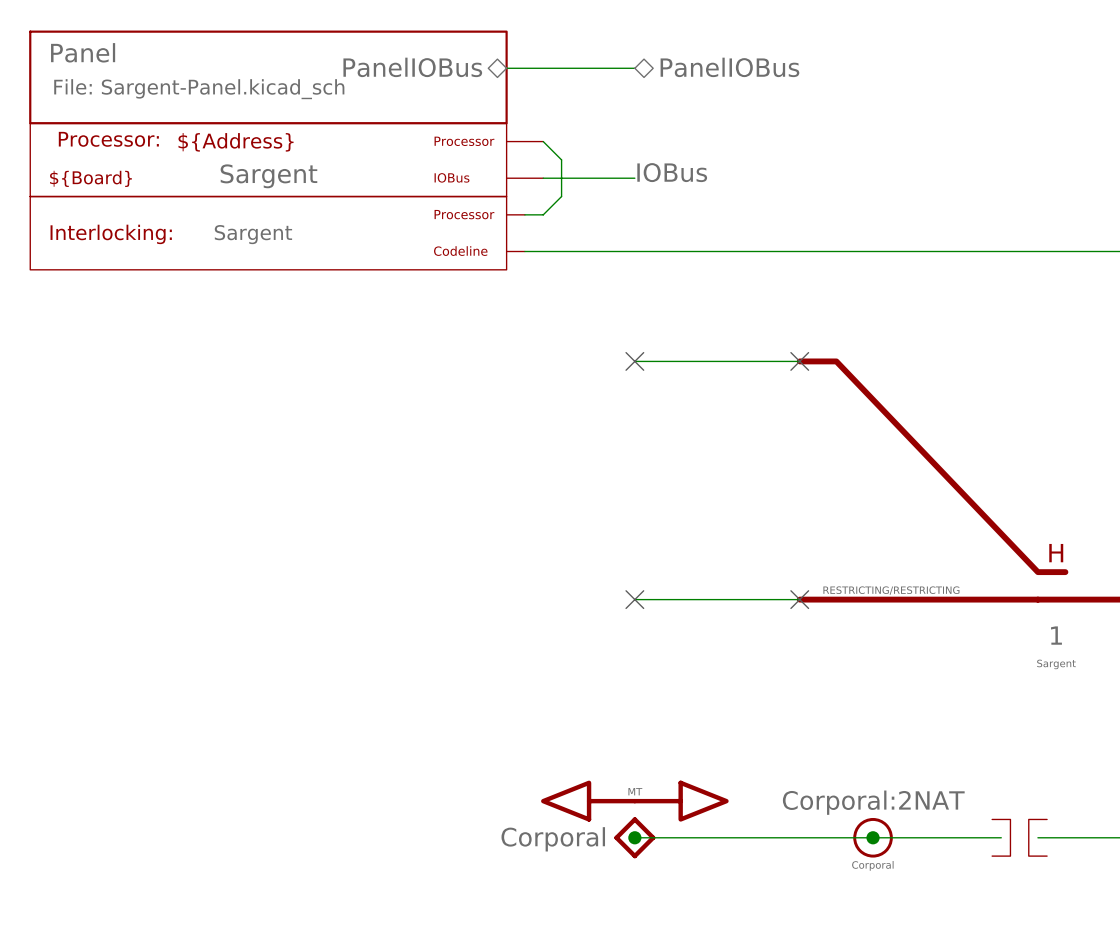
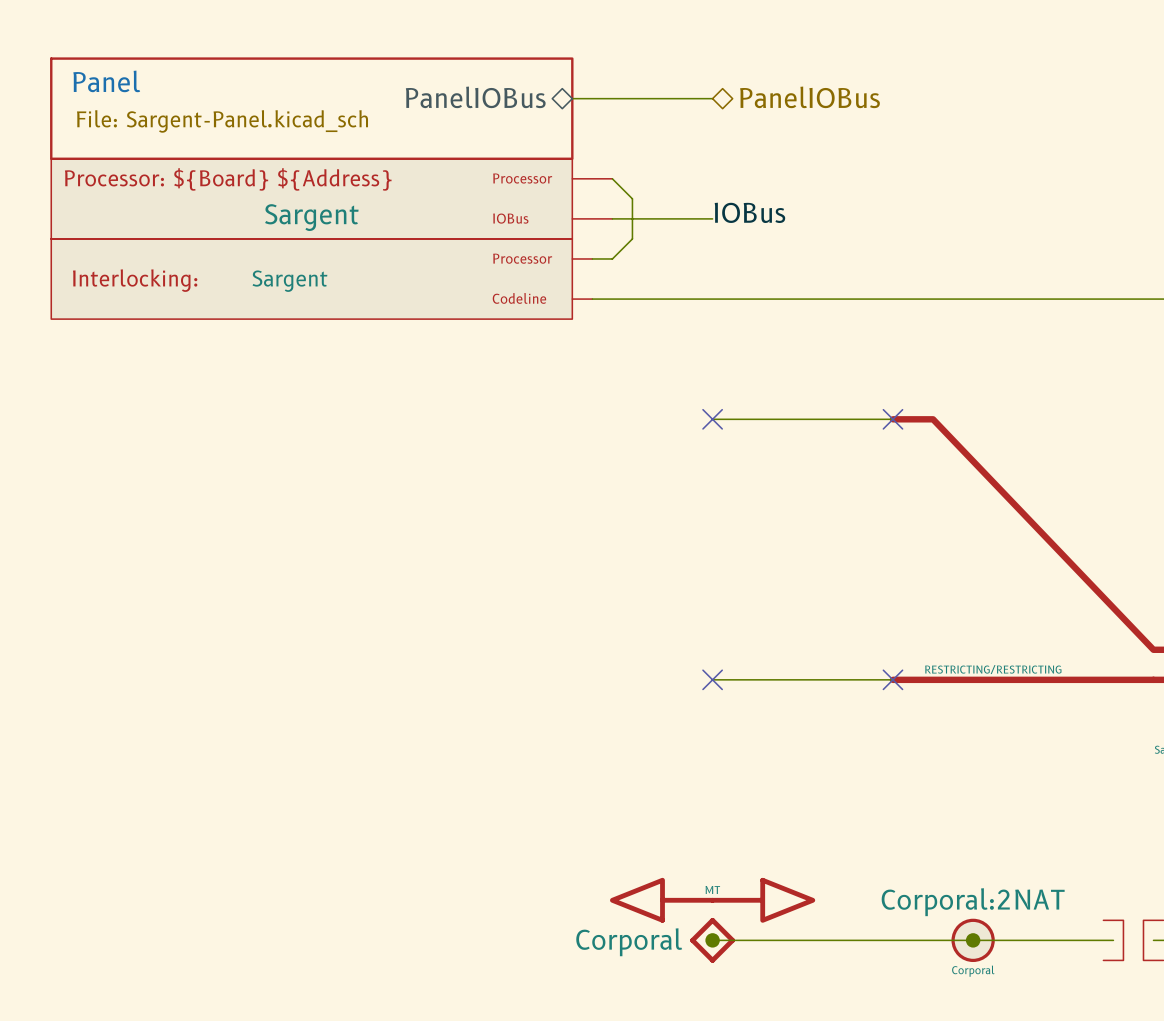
part text: Processor: (108, 139) -> none
part text: none -> Processor: ${Board} ${Address} (228, 179)
part text: ${Address} (236, 142) -> none
part text: ${Board} (91, 178) -> none

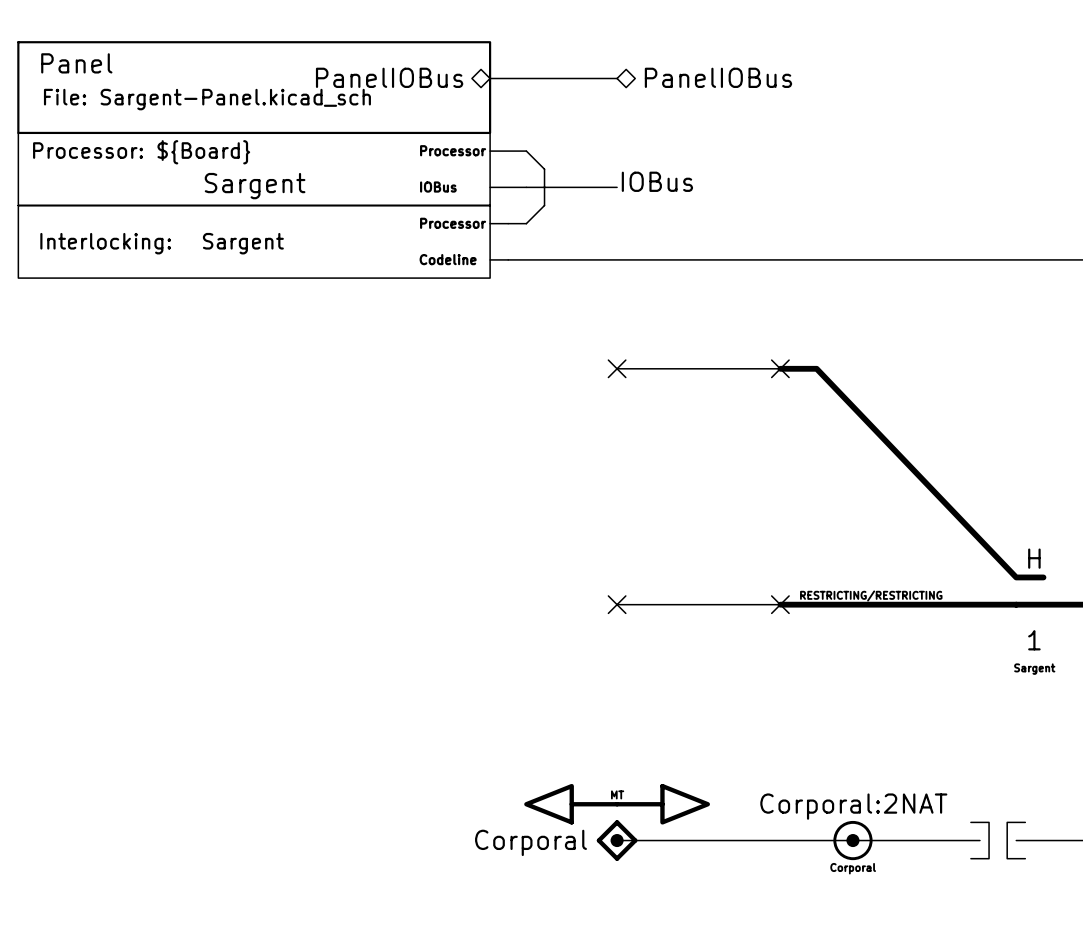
part text: Processor: ${Board} ${Address} (228, 179) -> Processor: ${Board} (141, 152)

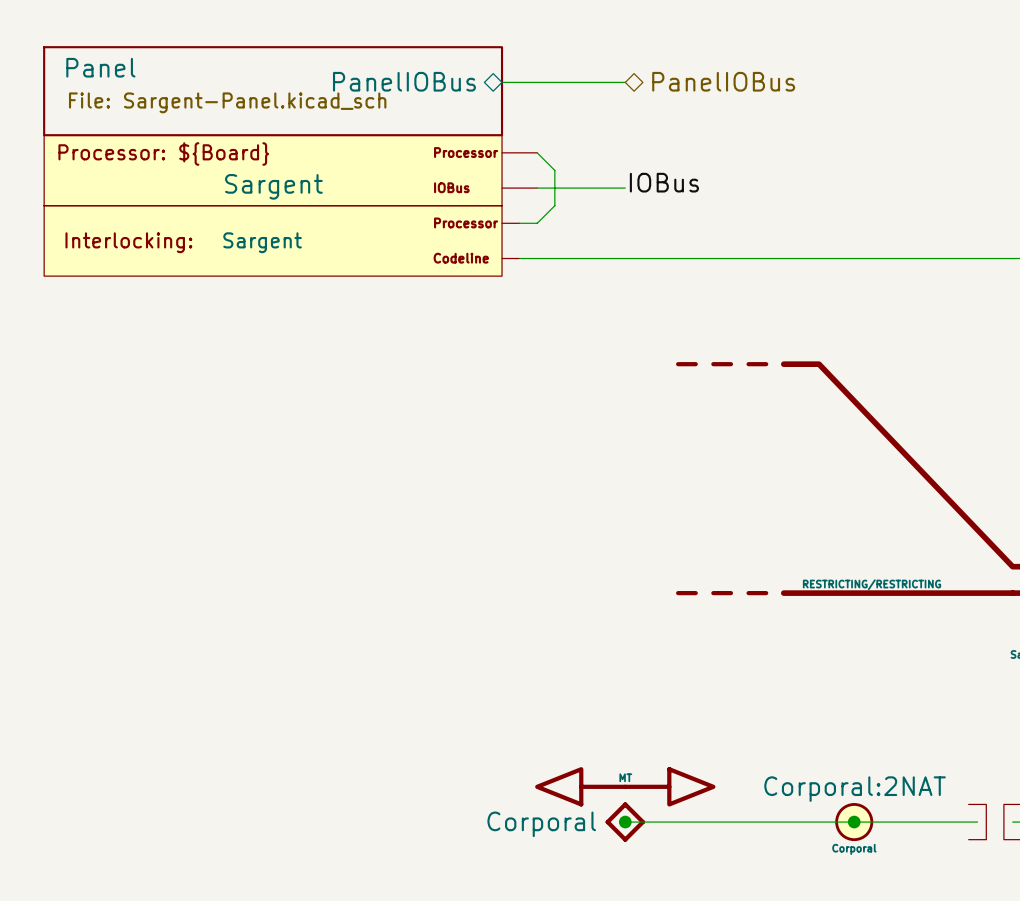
wire: (617, 368) (780, 368) -> none
no-connect mark: (617, 368) -> none
part: none -> (722, 364)
no-connect mark: (780, 368) -> none
wire: (617, 604) (780, 604) -> none
no-connect mark: (617, 604) -> none
part: none -> (722, 593)
no-connect mark: (780, 604) -> none

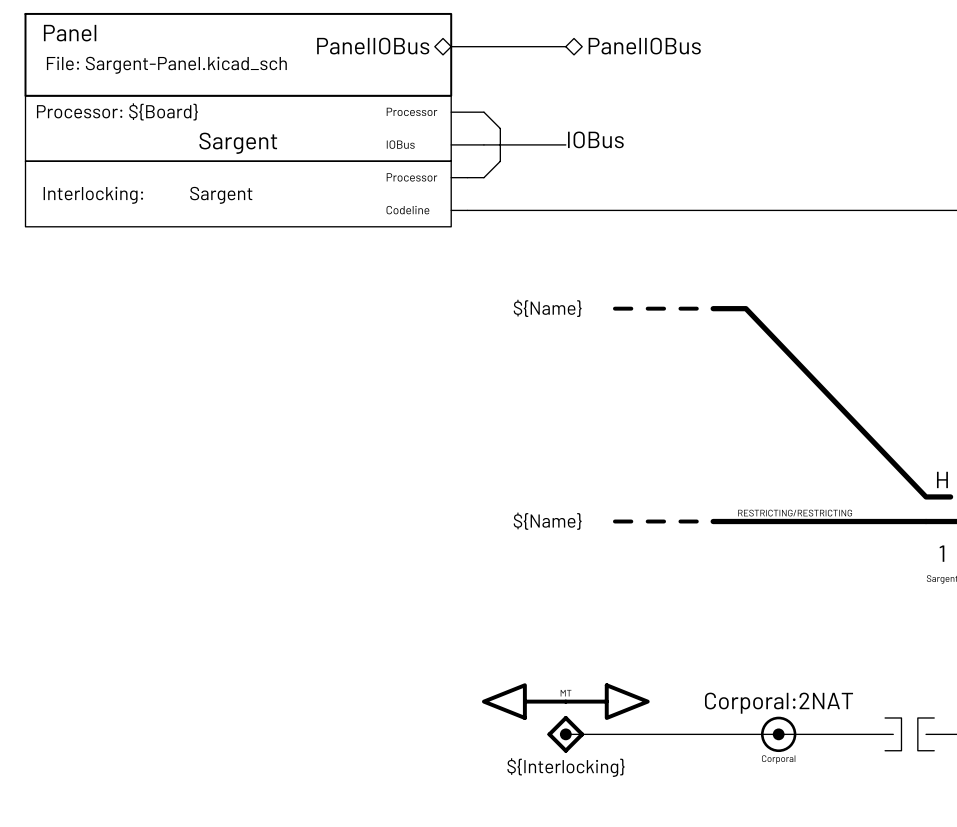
part text: none -> ${Name} (547, 308)
part text: none -> ${Name} (547, 521)
part value: Corporal (541, 824) -> none
part text: none -> ${Interlocking} (566, 767)

